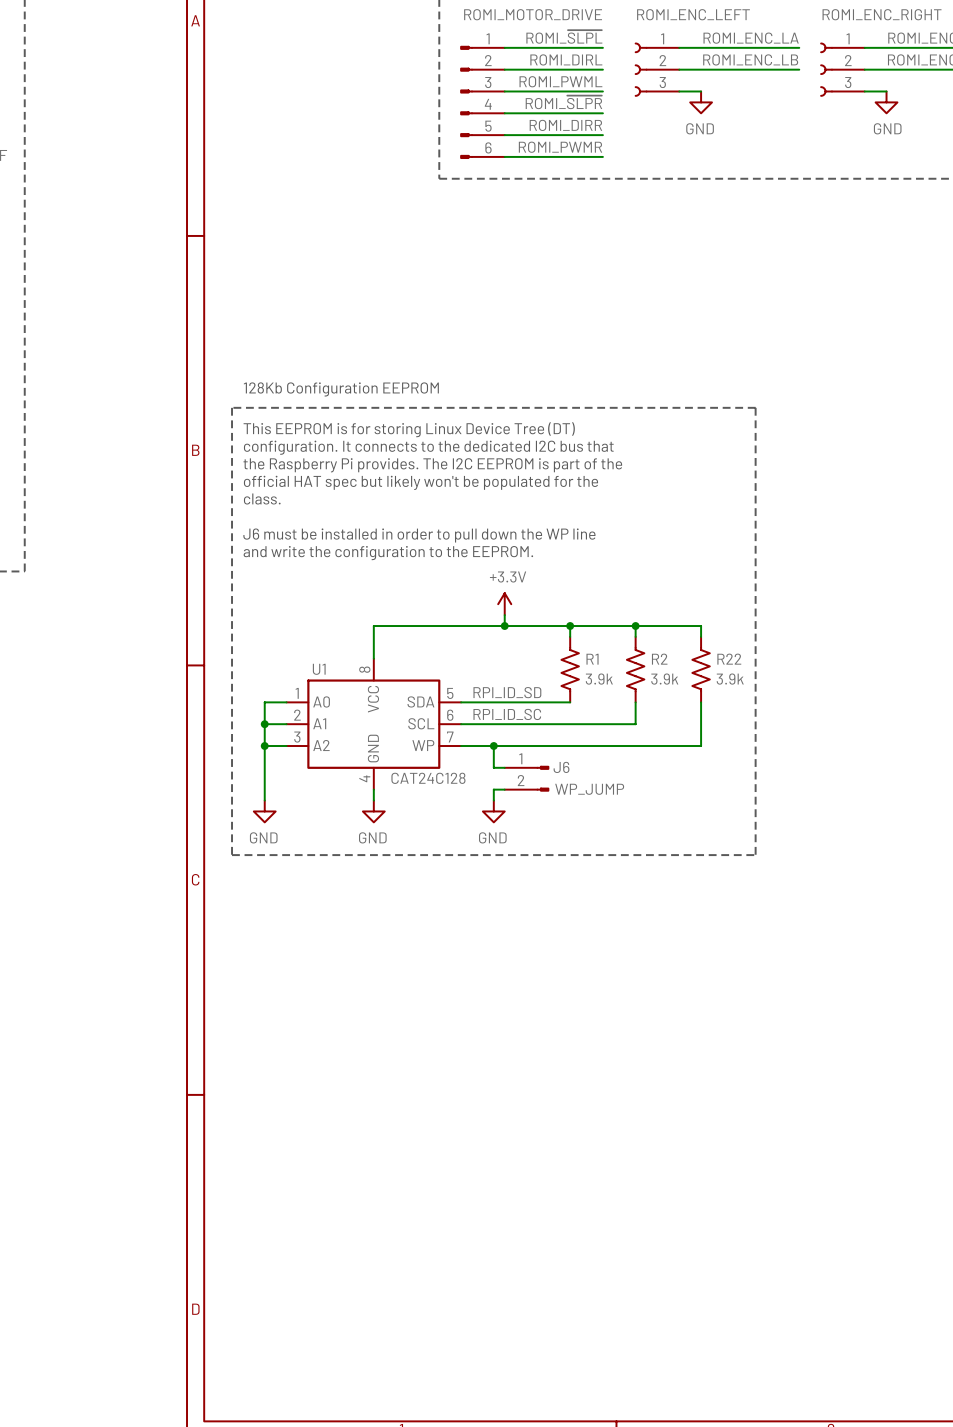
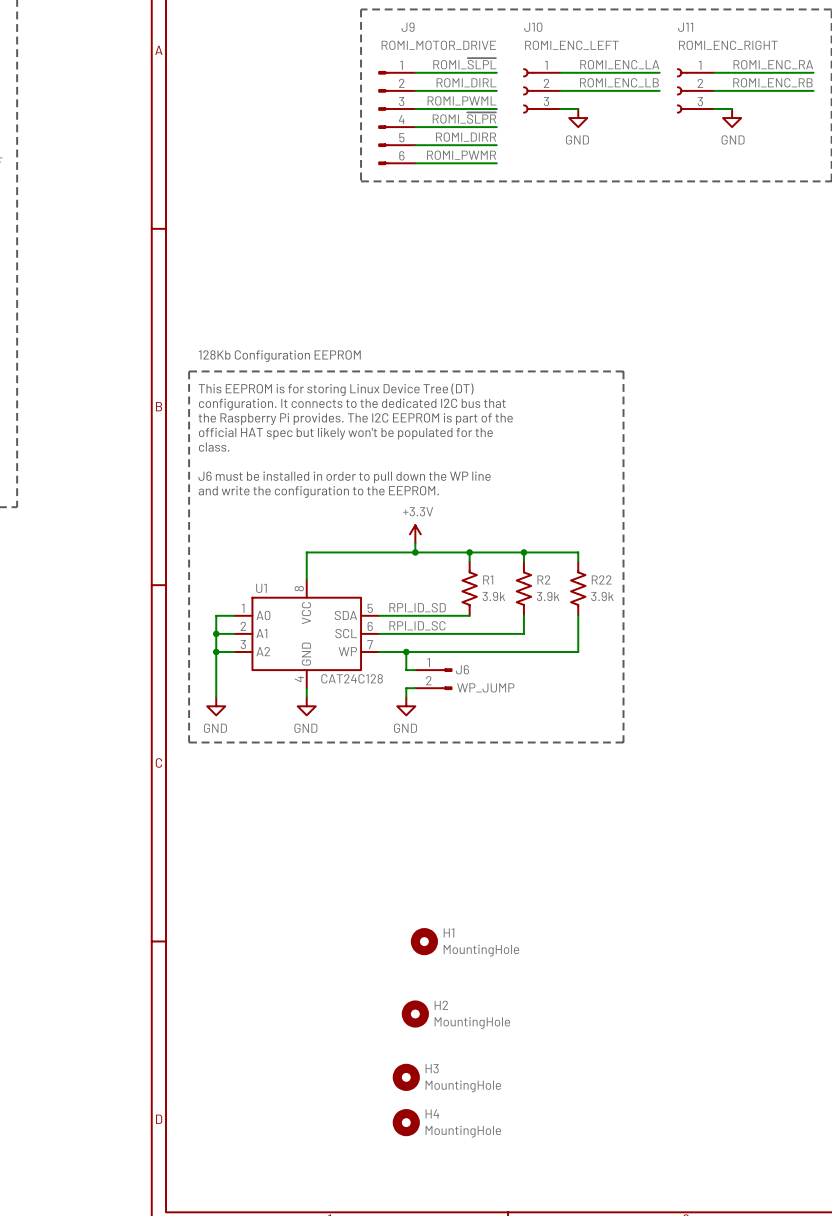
H1: none -> MountingHole (424, 941)
H2: none -> MountingHole (415, 1014)
H3: none -> MountingHole (406, 1077)
H4: none -> MountingHole (406, 1122)

